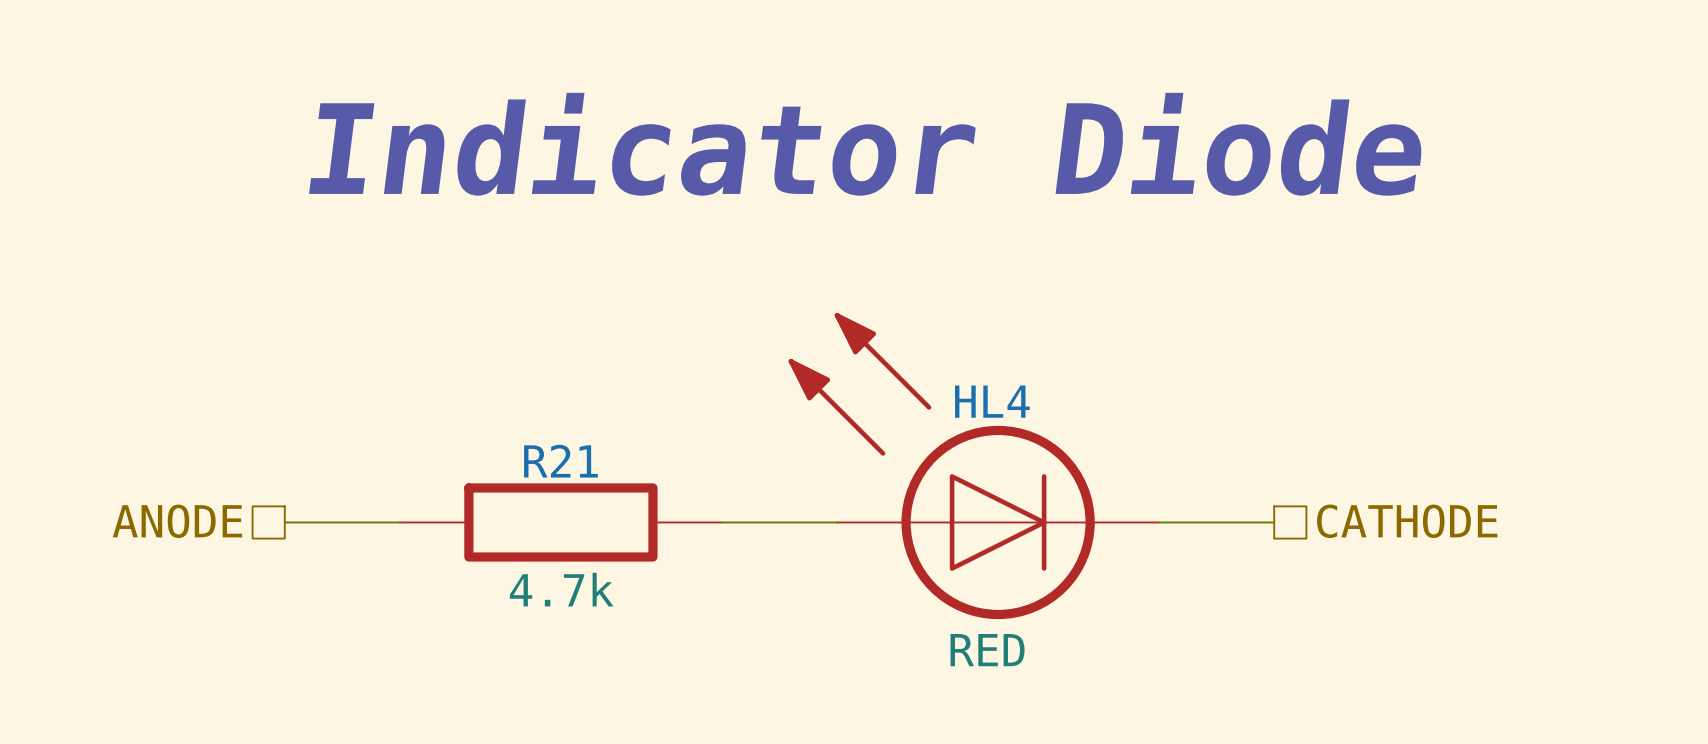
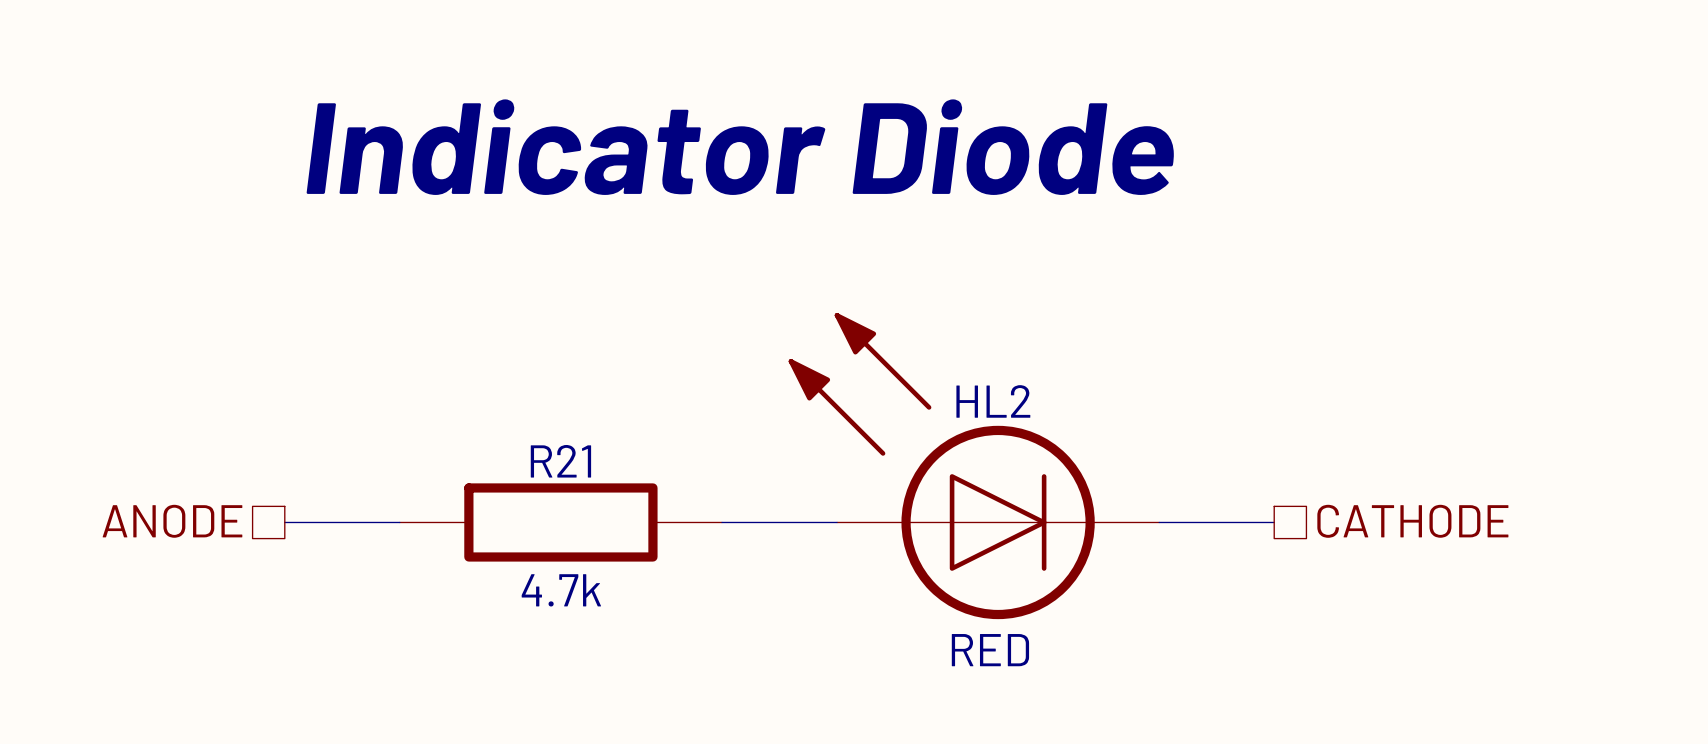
HL4 name: HL4 (992, 401) -> HL2 (993, 401)

